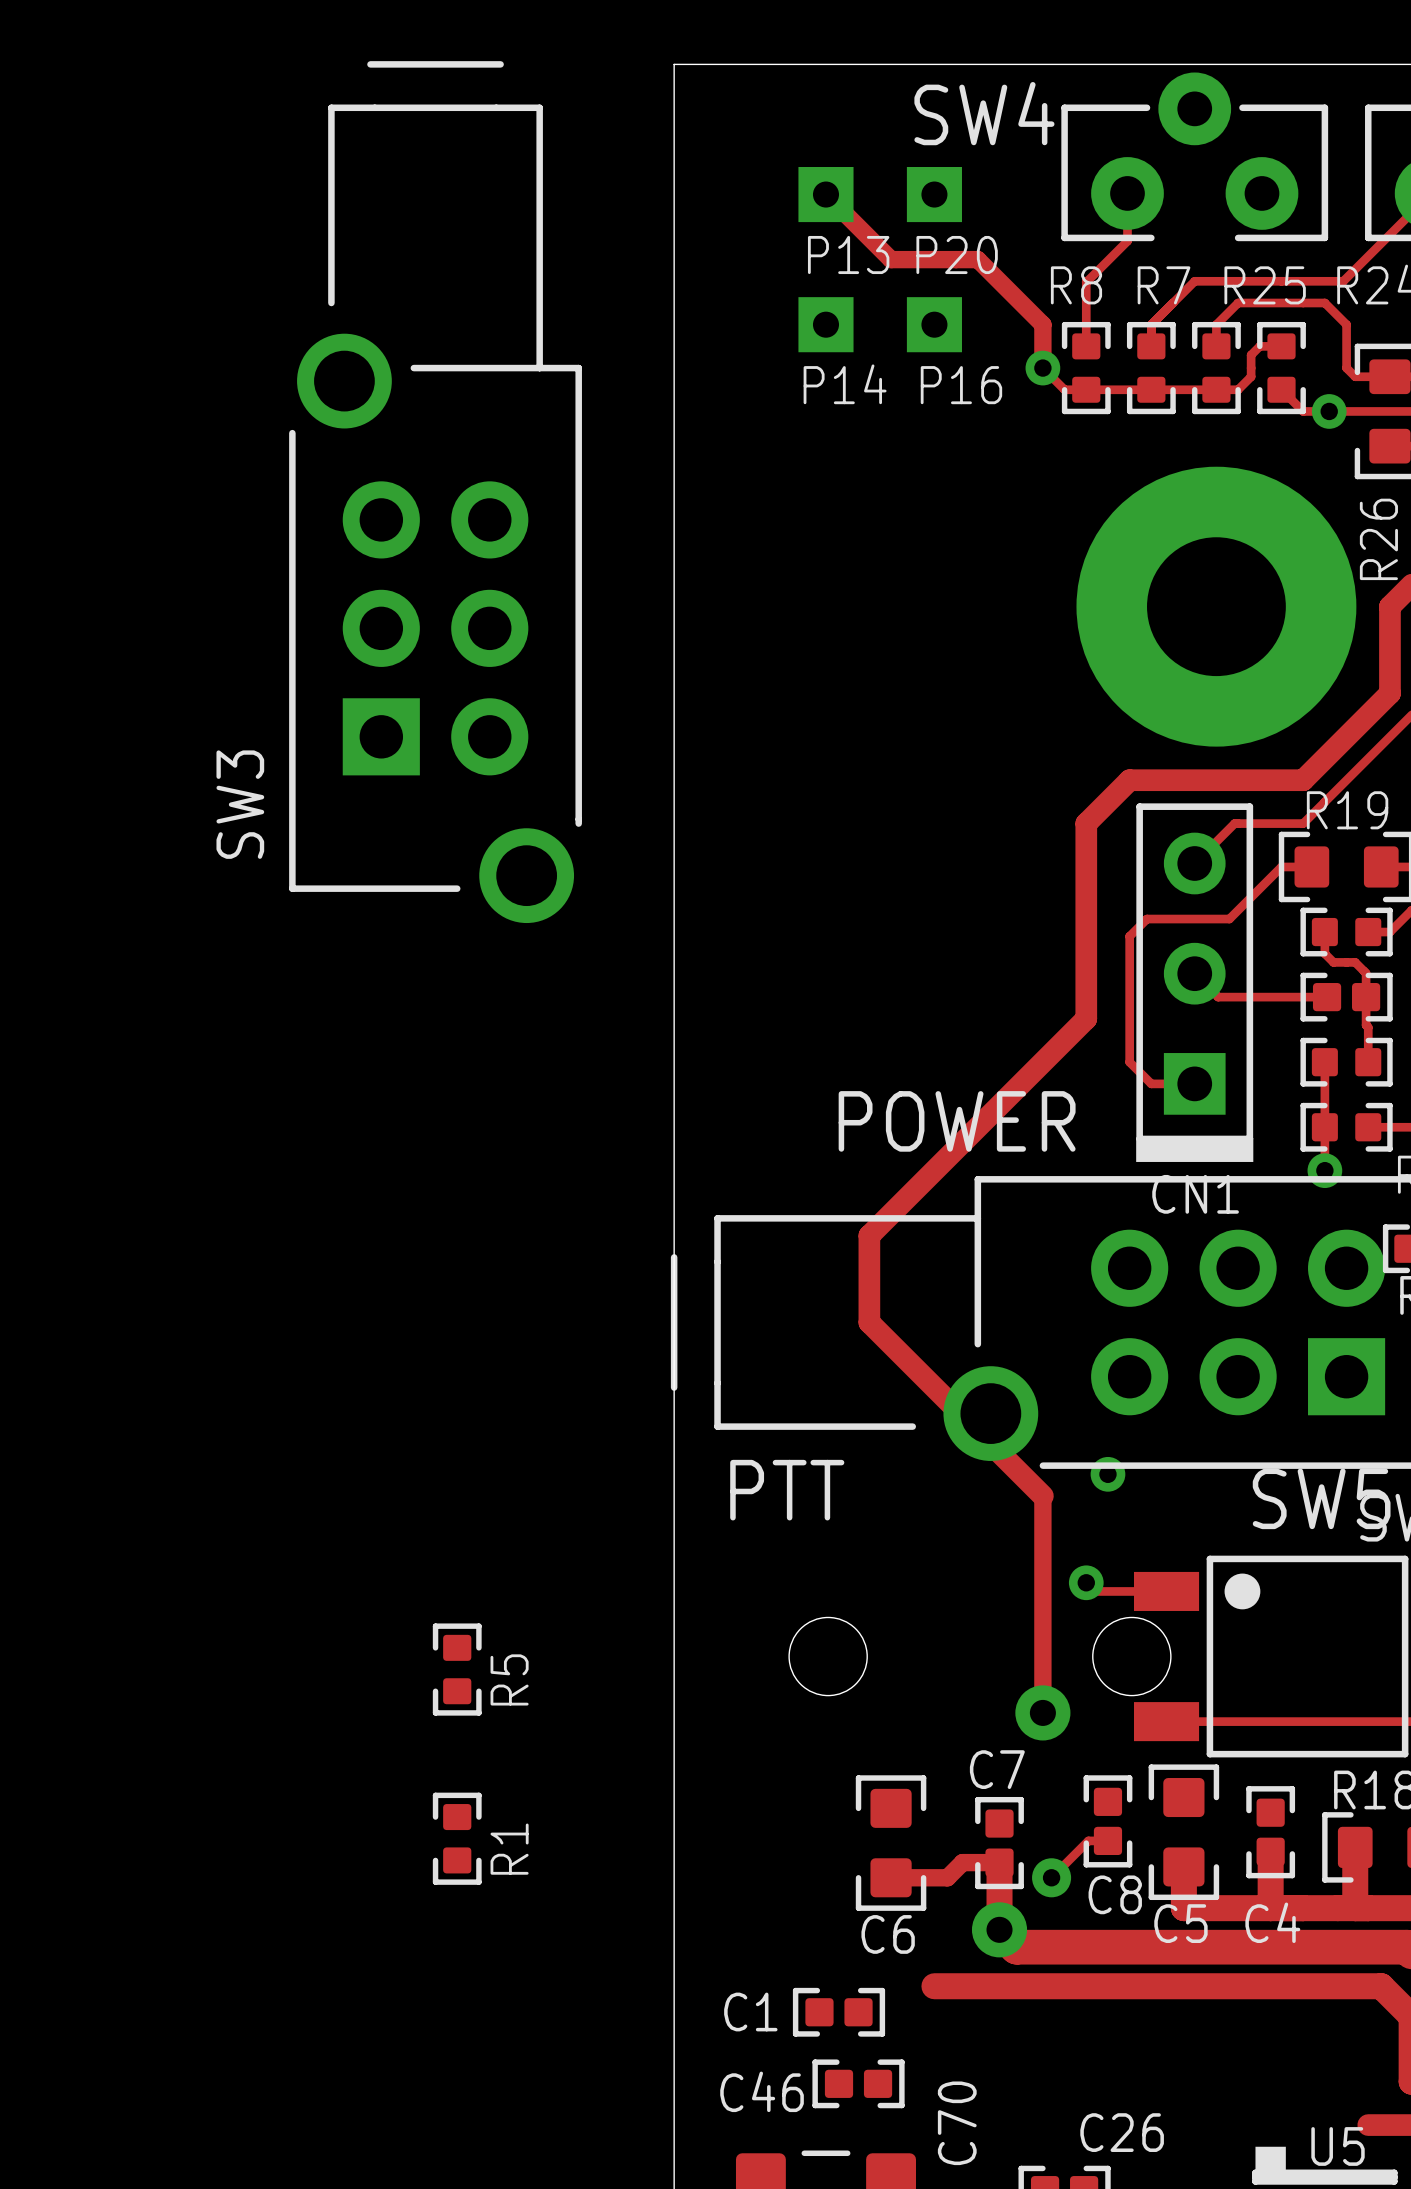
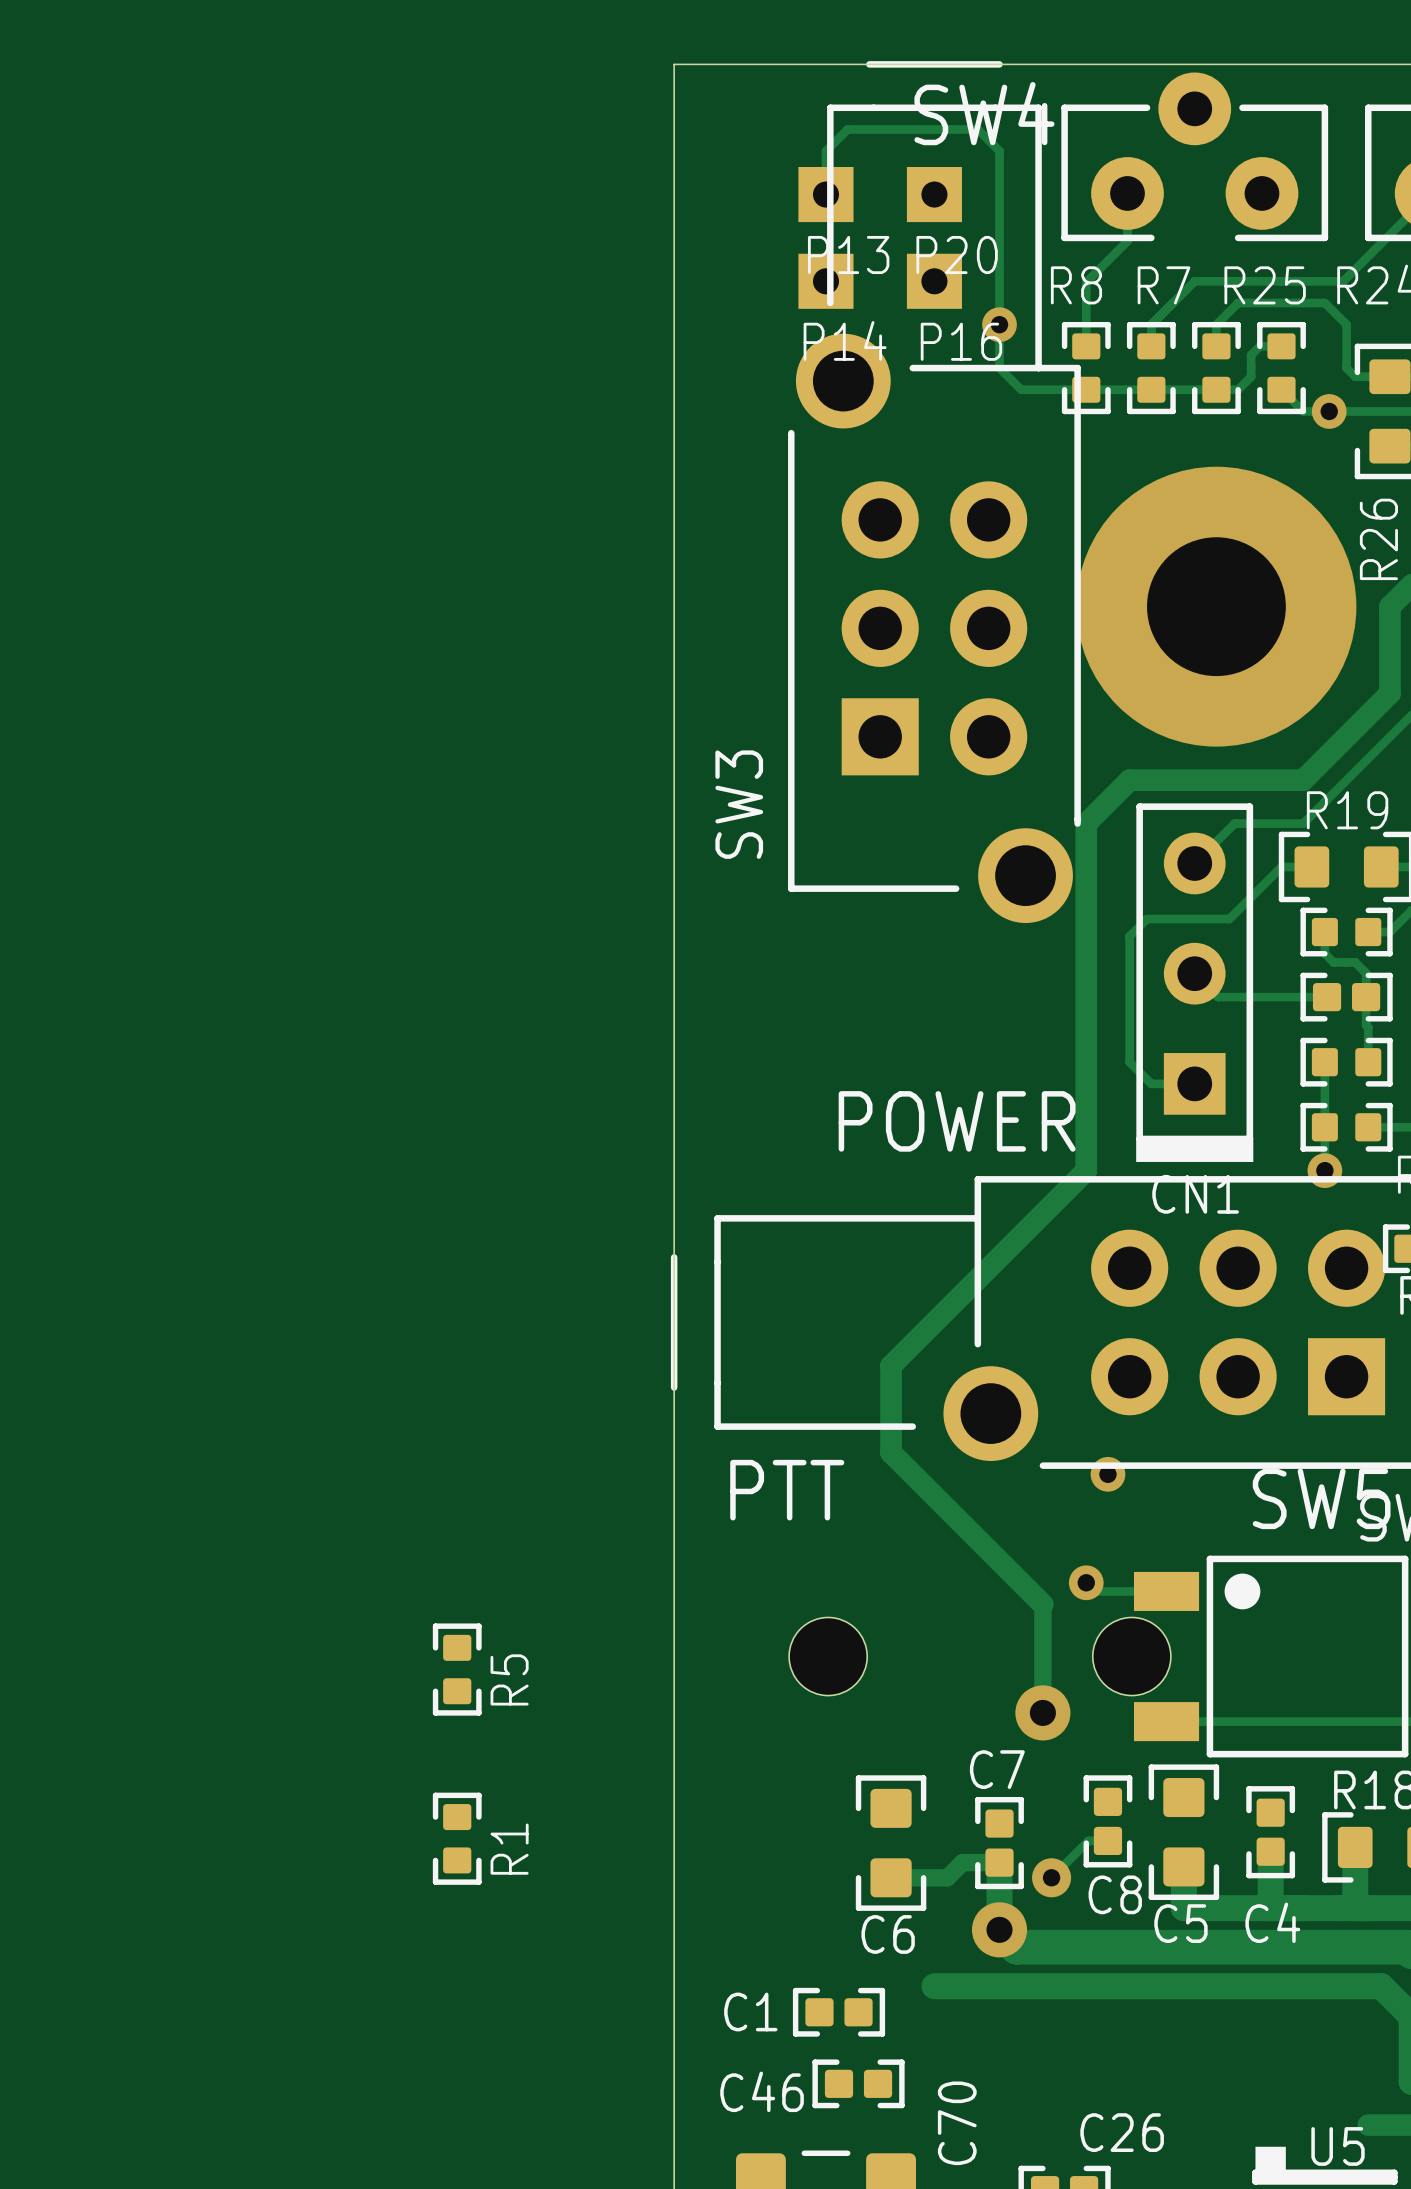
track: (825, 194) (891, 259) (977, 259) (1042, 324) (1042, 368) (1064, 389) -> (825, 194) (825, 151) (847, 129) (977, 129) (999, 151) (999, 368) (1021, 389) (1064, 389)
P14 position: (825, 324) -> (825, 281)
P16 position: (934, 324) -> (934, 281)
via position: (1042, 368) -> (999, 324)
SW3 position: (435, 492) -> (934, 492)
track: (1086, 1018) (869, 1235) (869, 1322) (1042, 1496) (1042, 1604) -> (1086, 1018) (1086, 1170) (891, 1365) (891, 1452) (1042, 1604)

